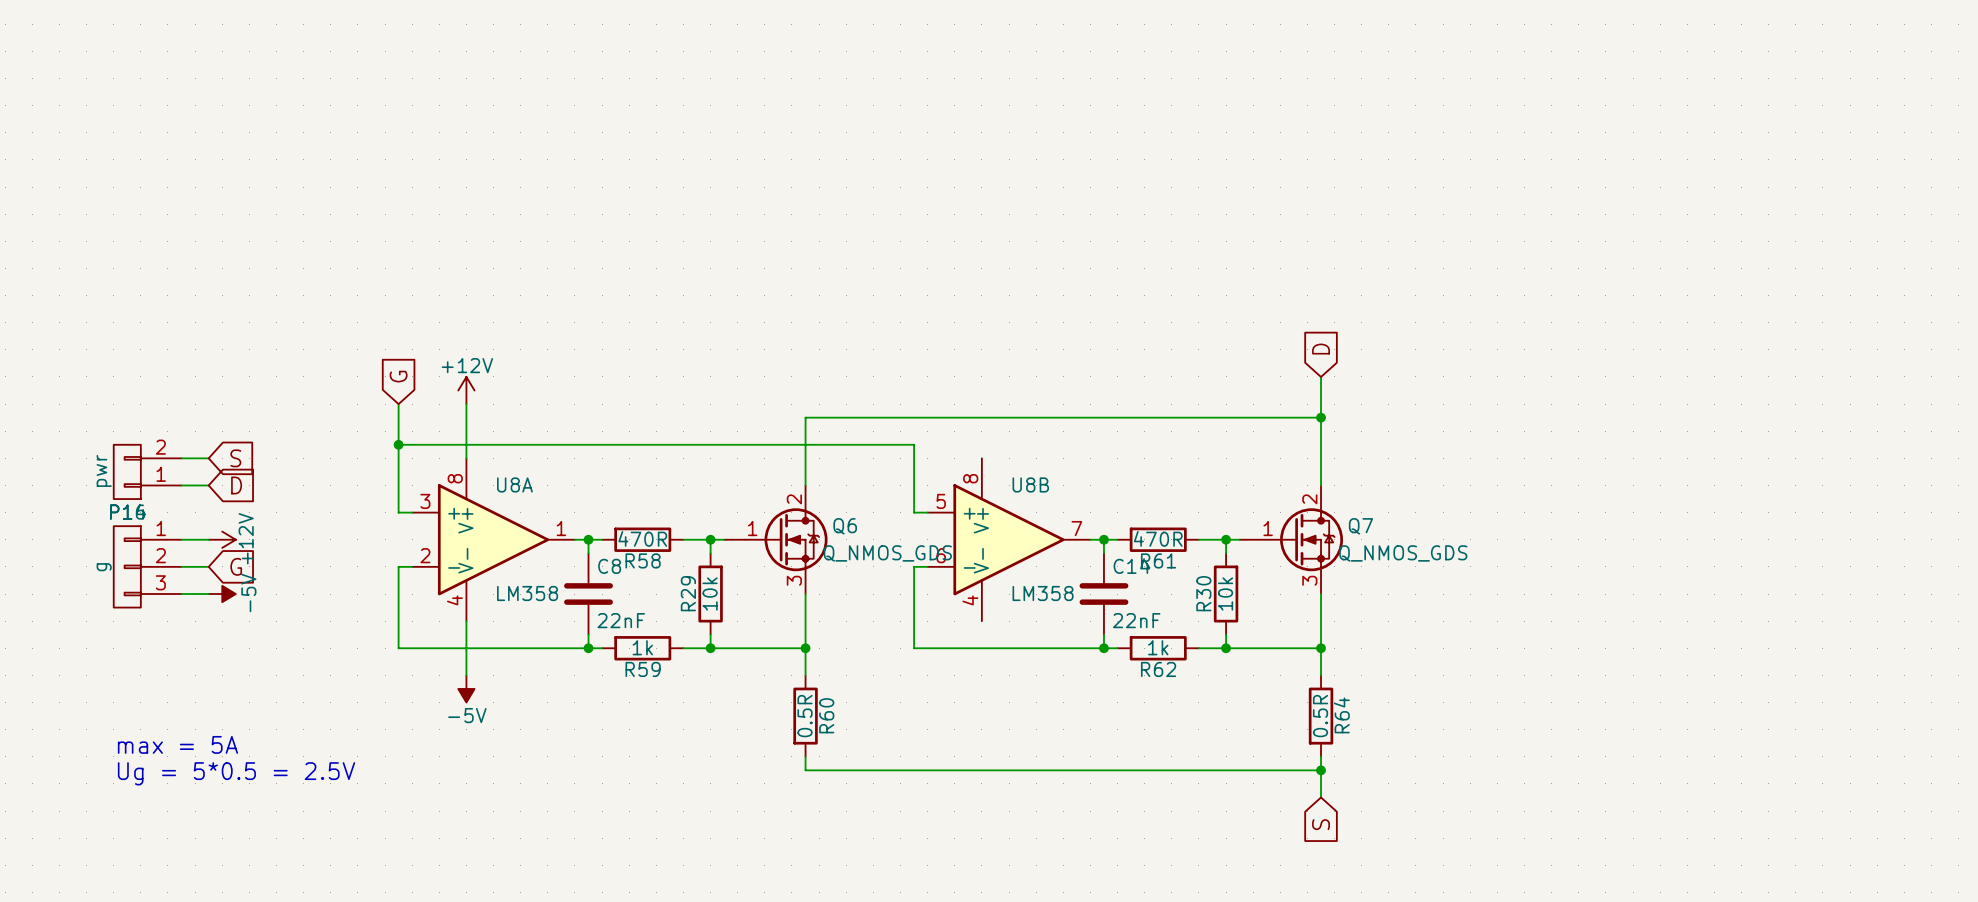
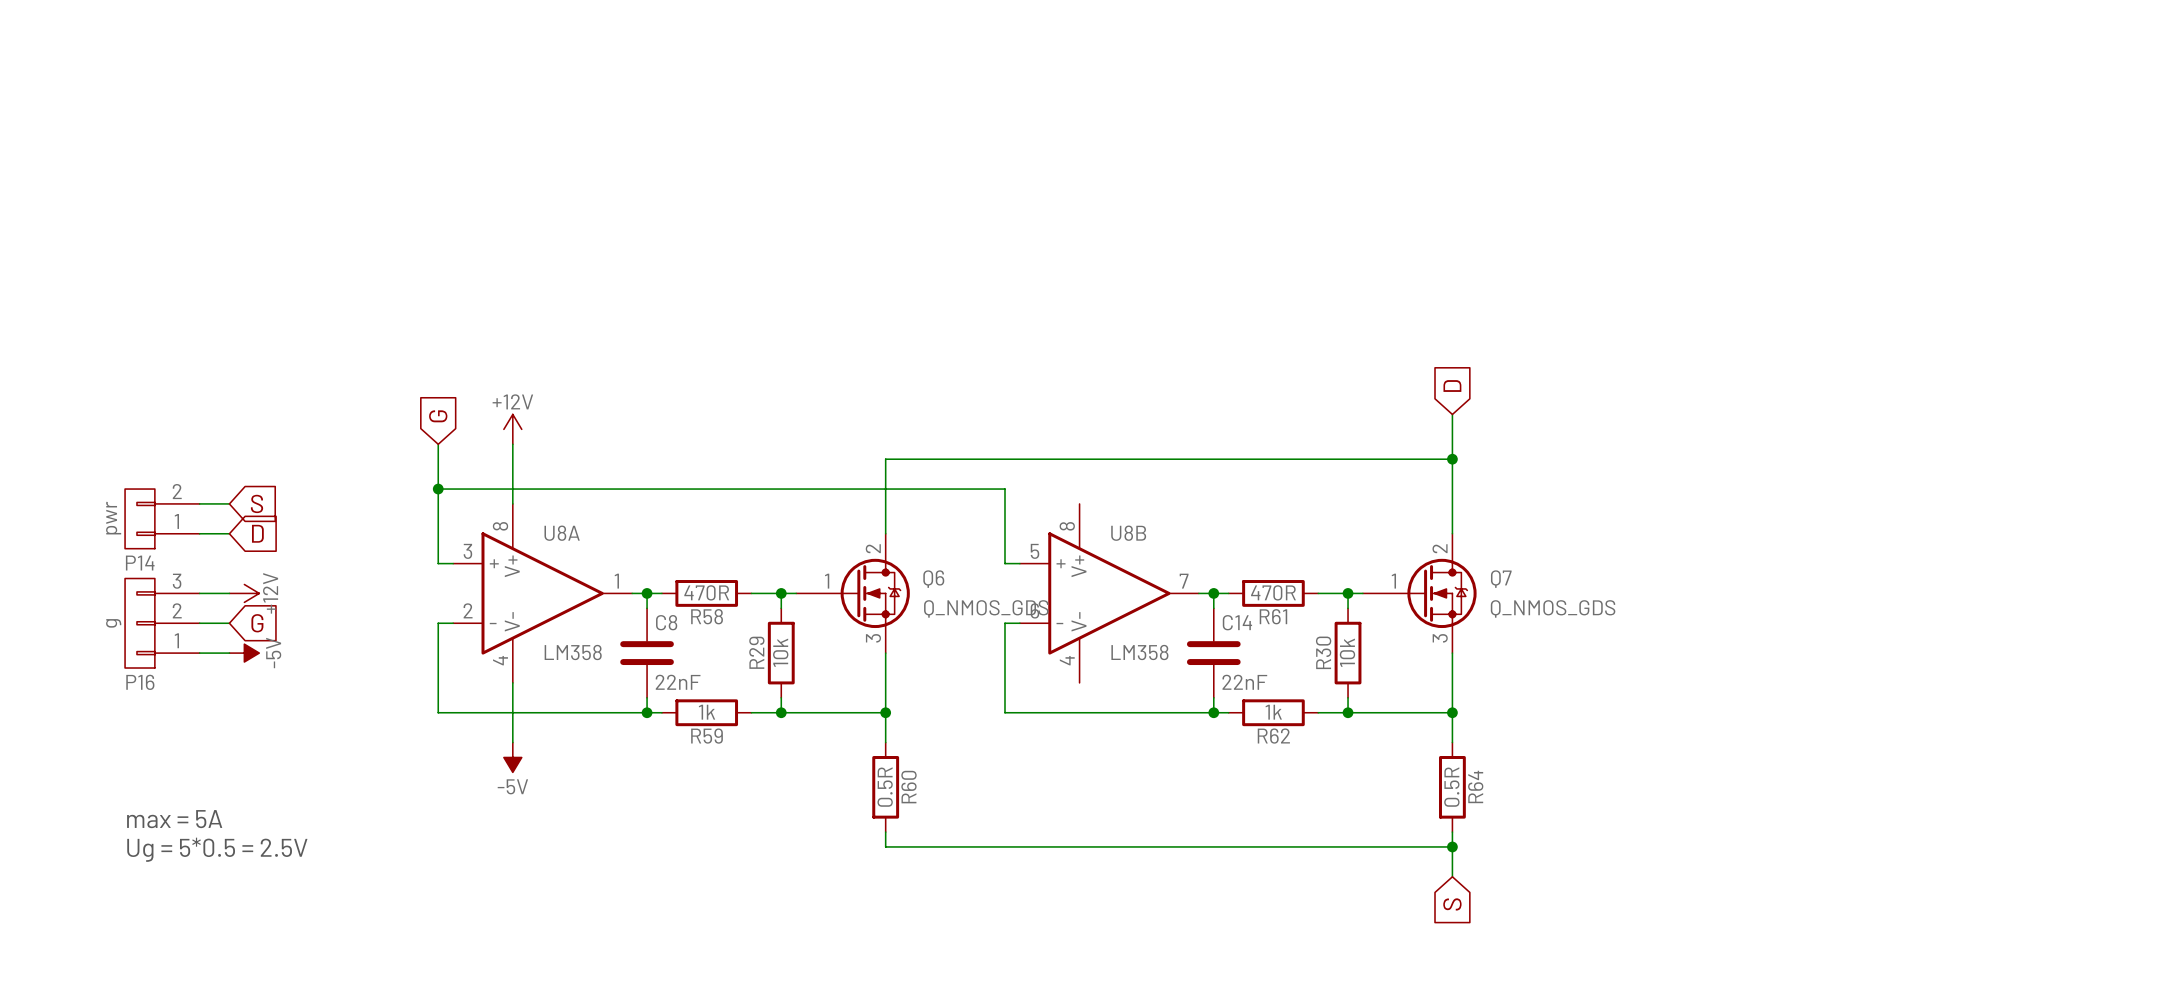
P16 flip: as is (127, 566) -> up-down (139, 623)

